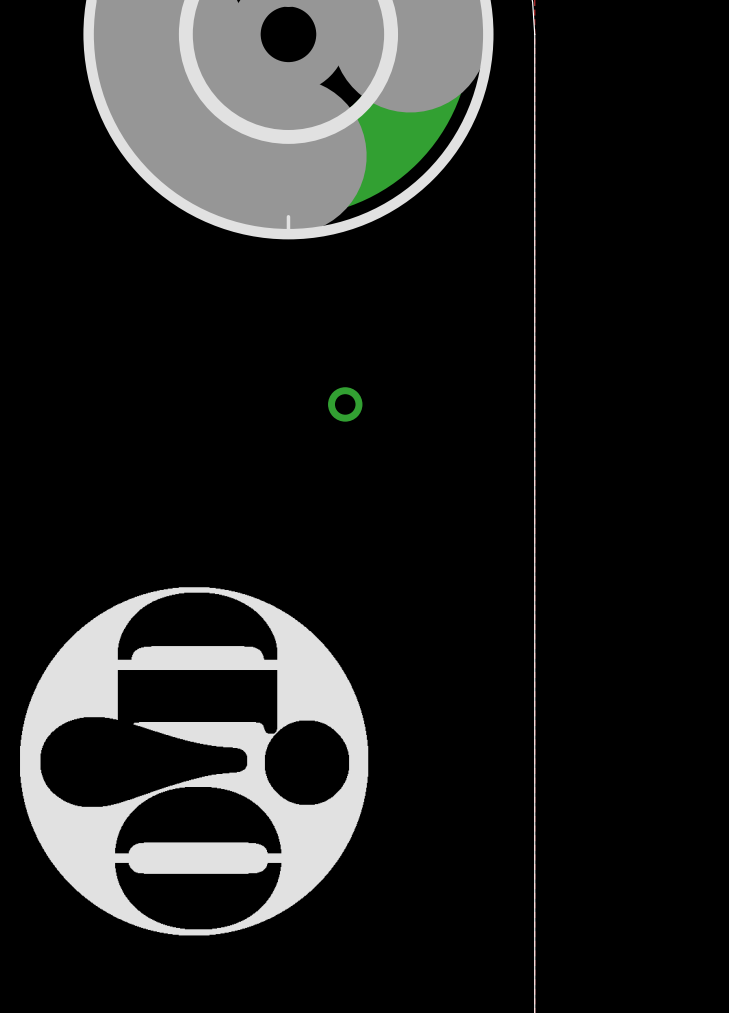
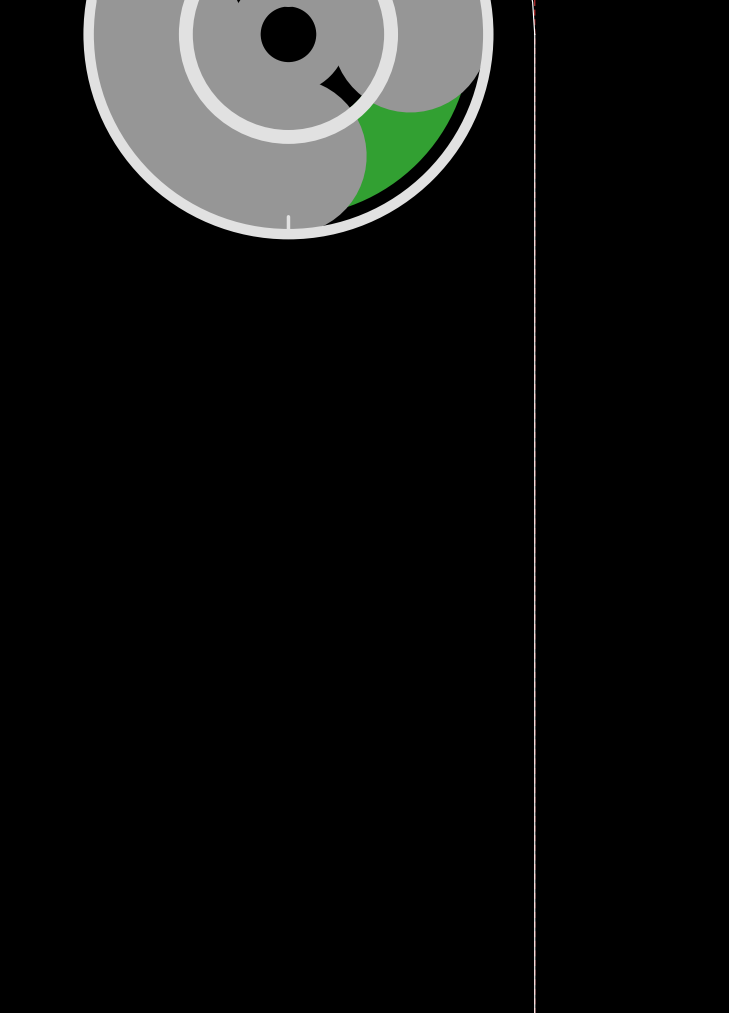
via: (345, 404) -> none
drawing: [20, 587, 369, 936] -> none

